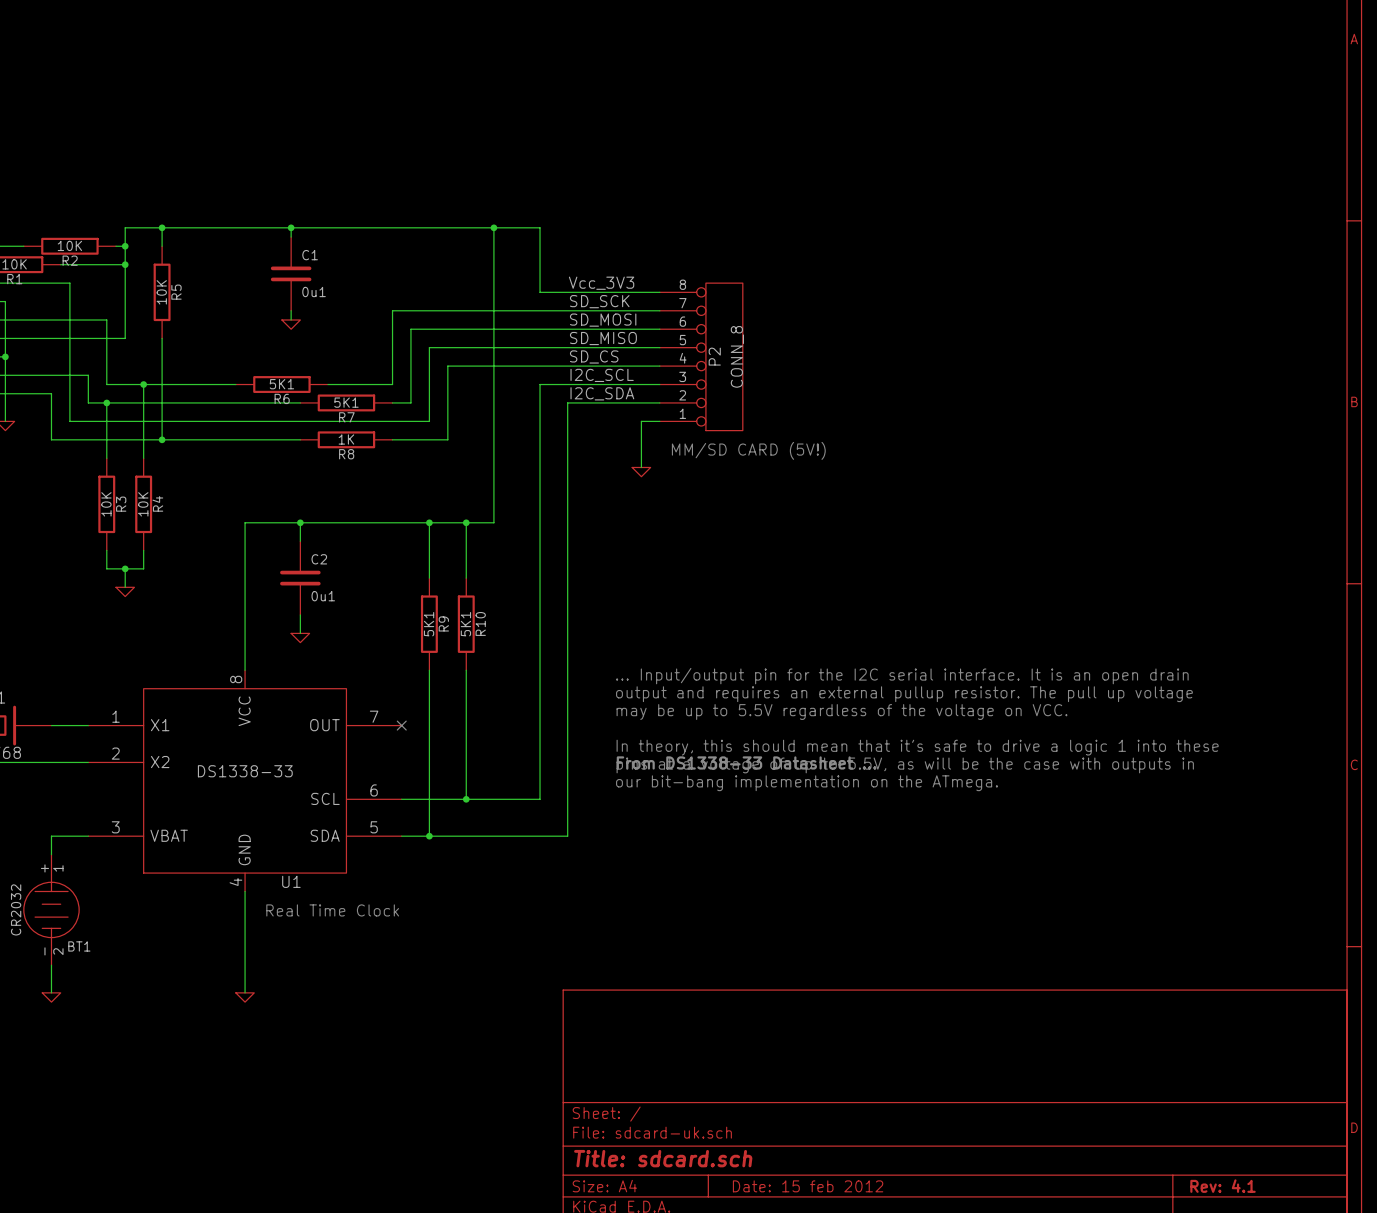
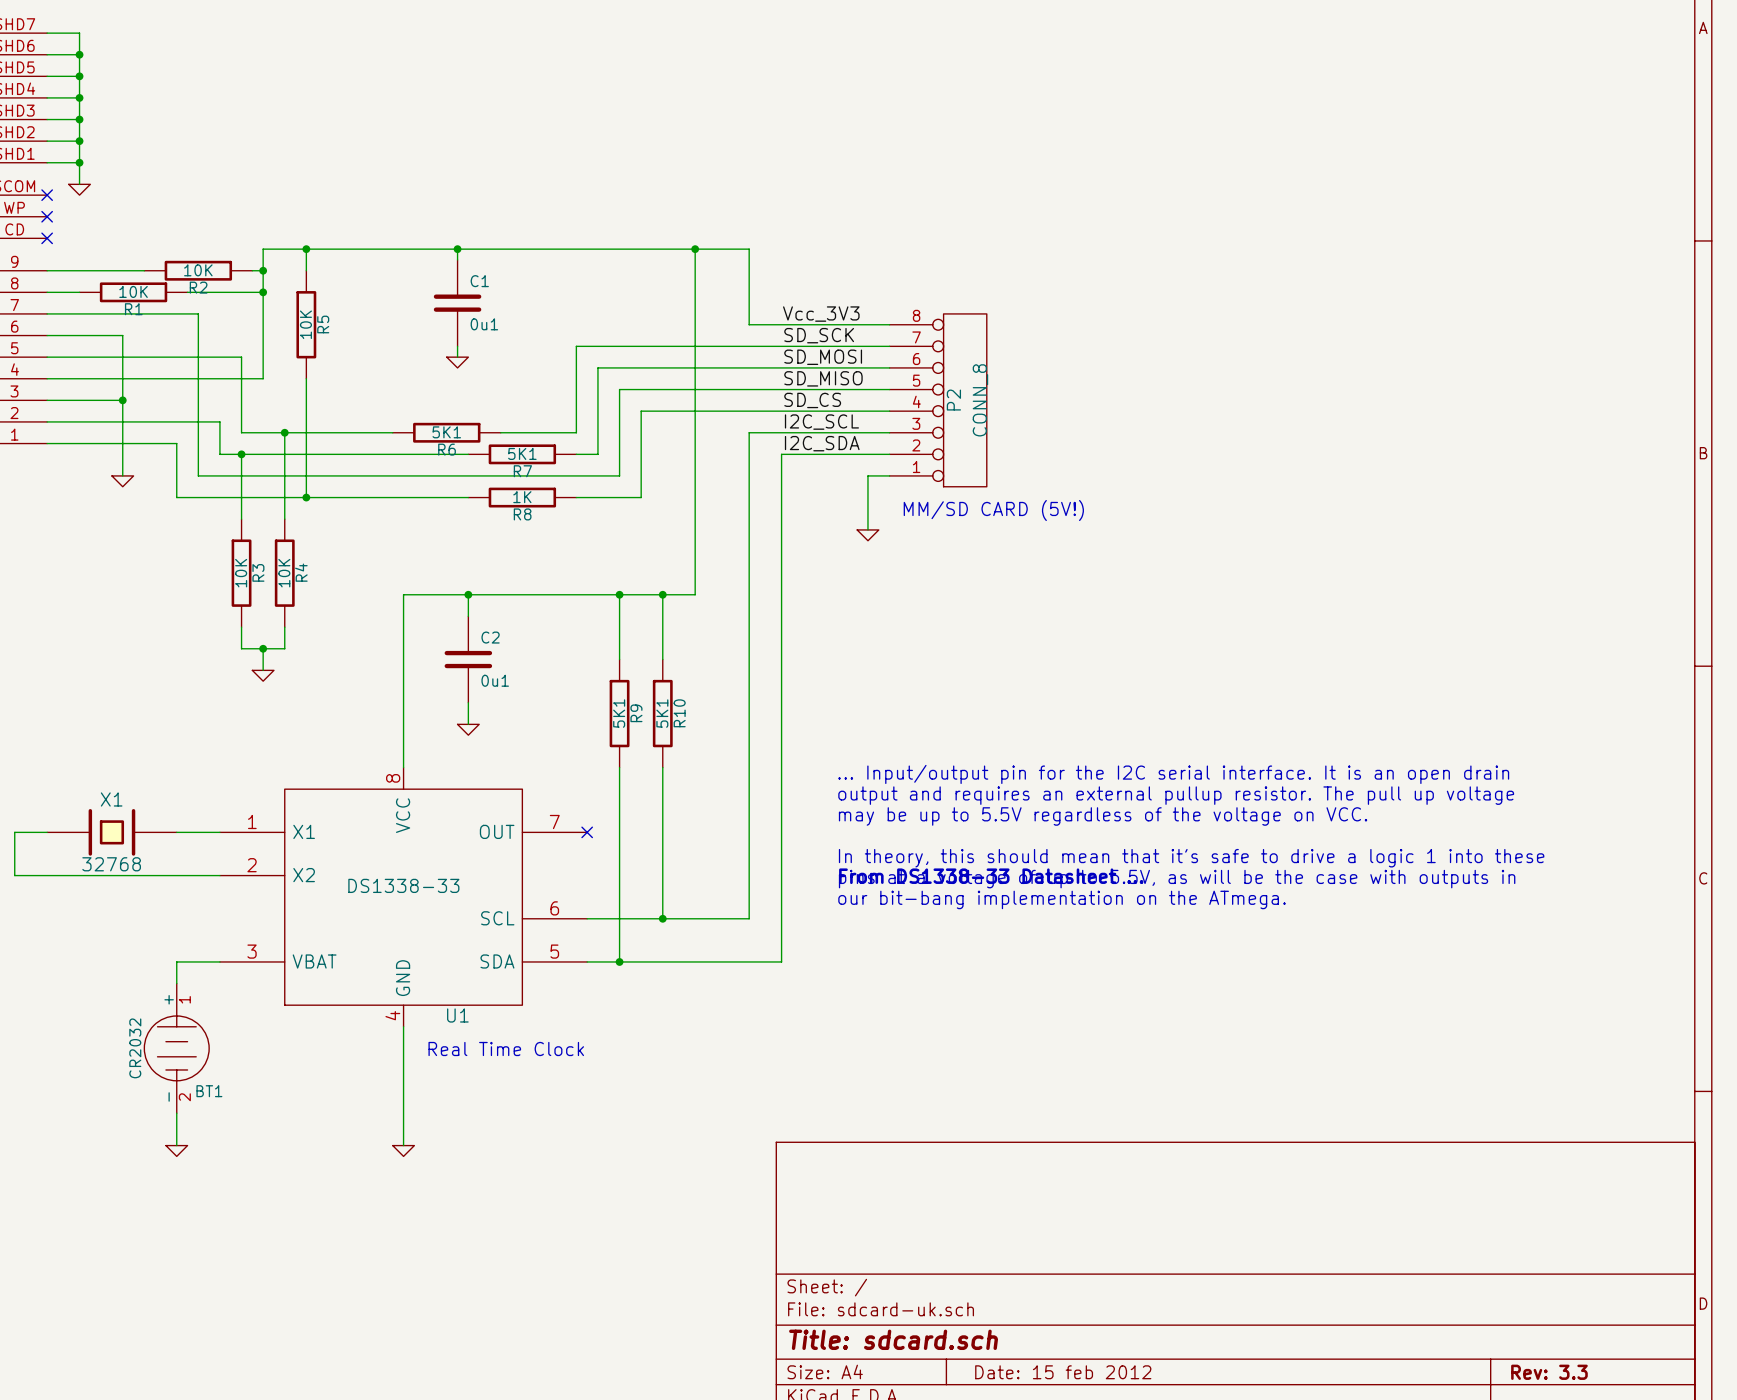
title block: Rev: 4.1 (1223, 1186) -> Rev: 3.3 (1549, 1372)

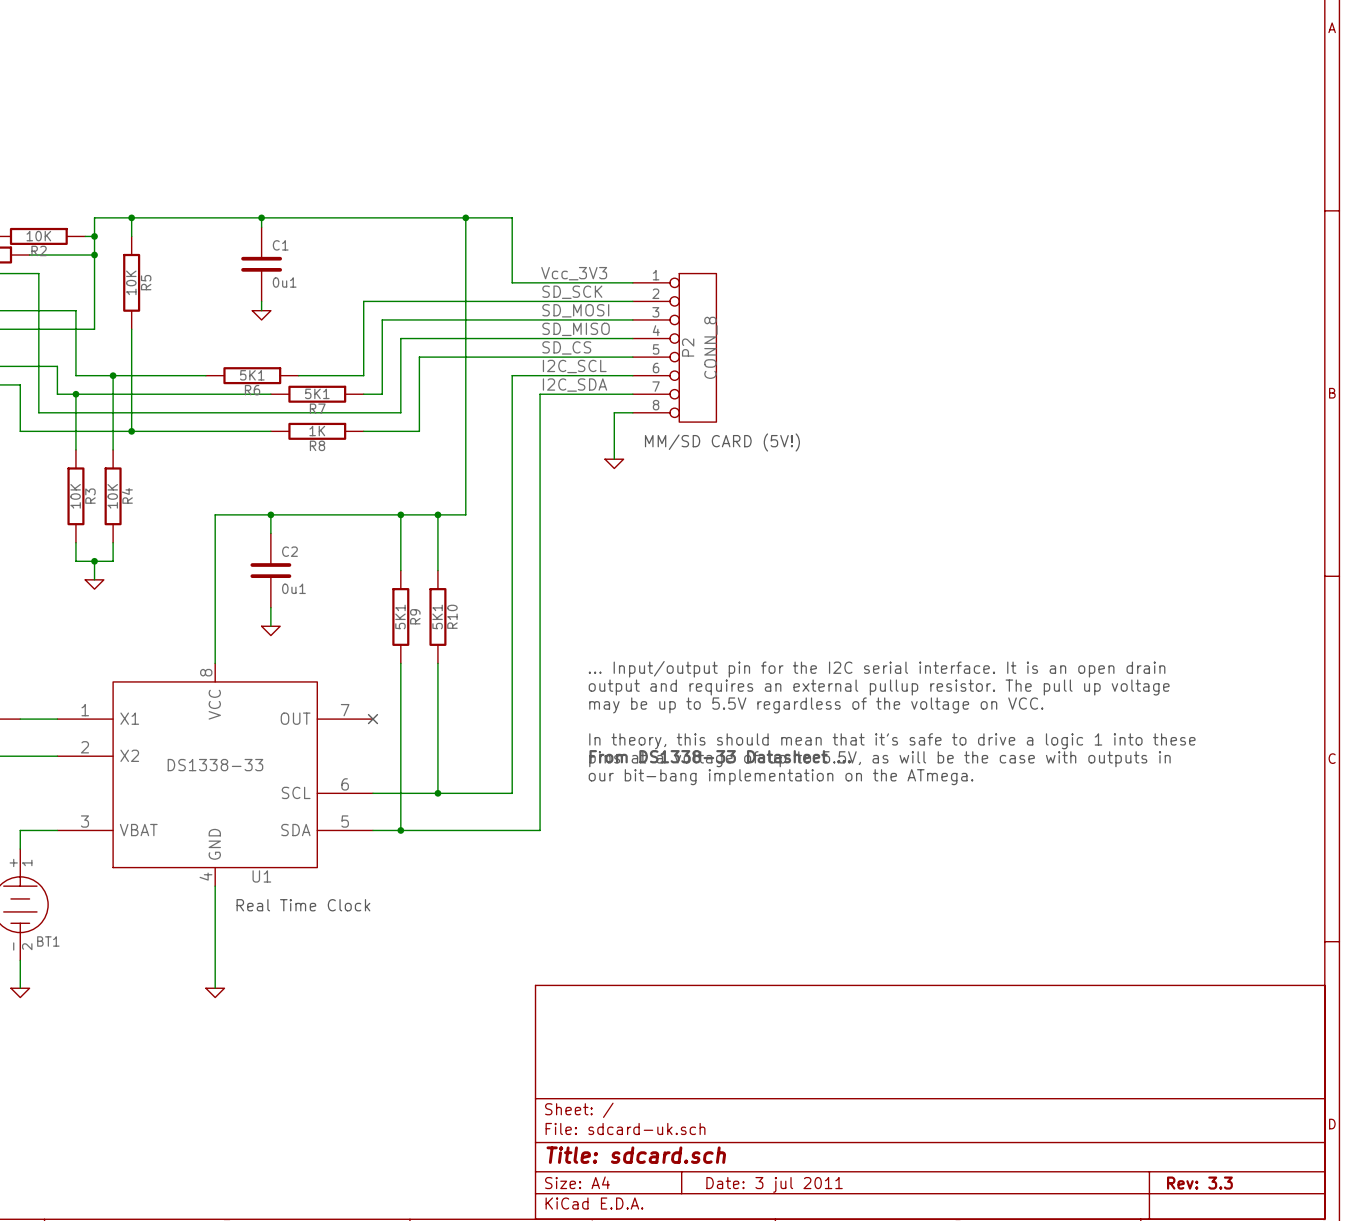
P2 flip: as is (965, 400) -> up-down (697, 347)
title block: Date: 15 feb 2012 (1063, 1372) -> Date: 3 jul 2011 (774, 1184)

